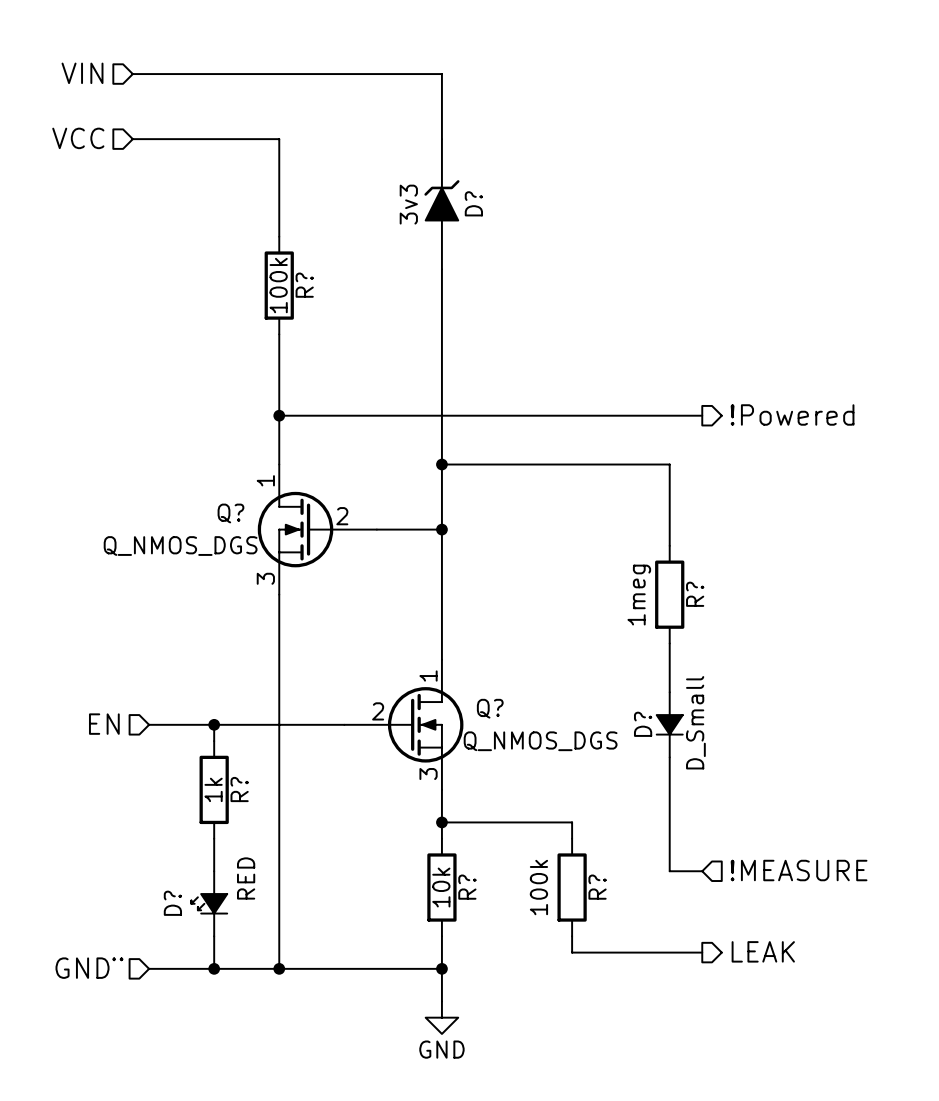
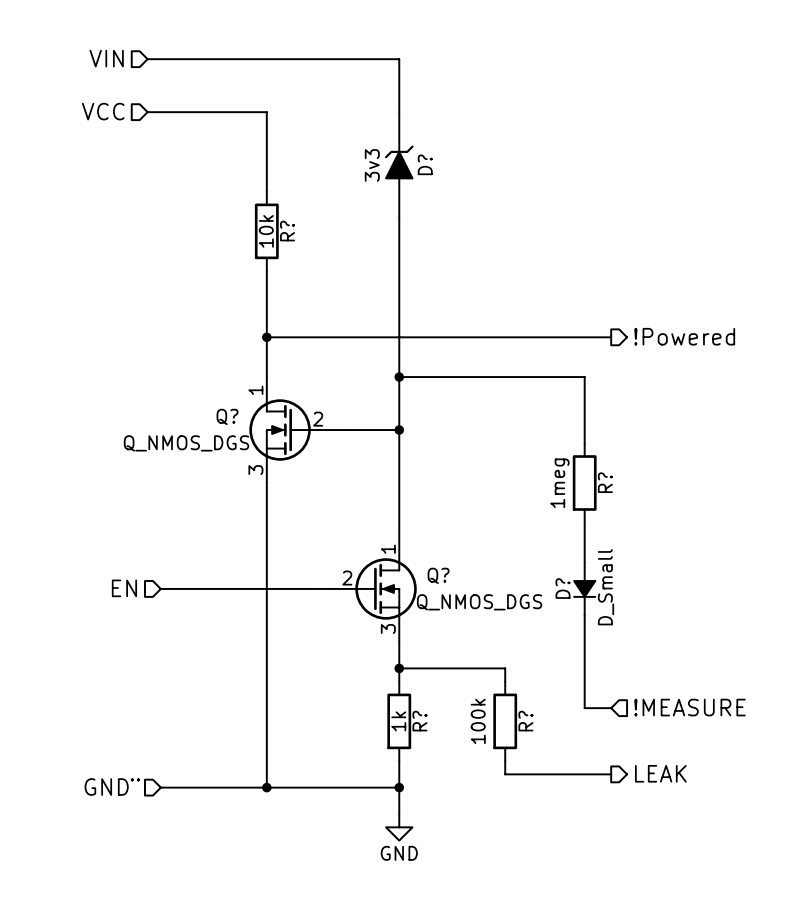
R? value: 100k (278, 285) -> 10k (266, 231)
wire: (214, 724) (214, 741) -> none
junction: (214, 724) -> none
R?: 1k (214, 789) -> none
wire: (214, 838) (214, 871) -> none
R? value: 10k (441, 887) -> 1k (398, 721)
D?: RED (209, 903) -> none
wire: (214, 936) (214, 968) -> none
junction: (214, 968) -> none

